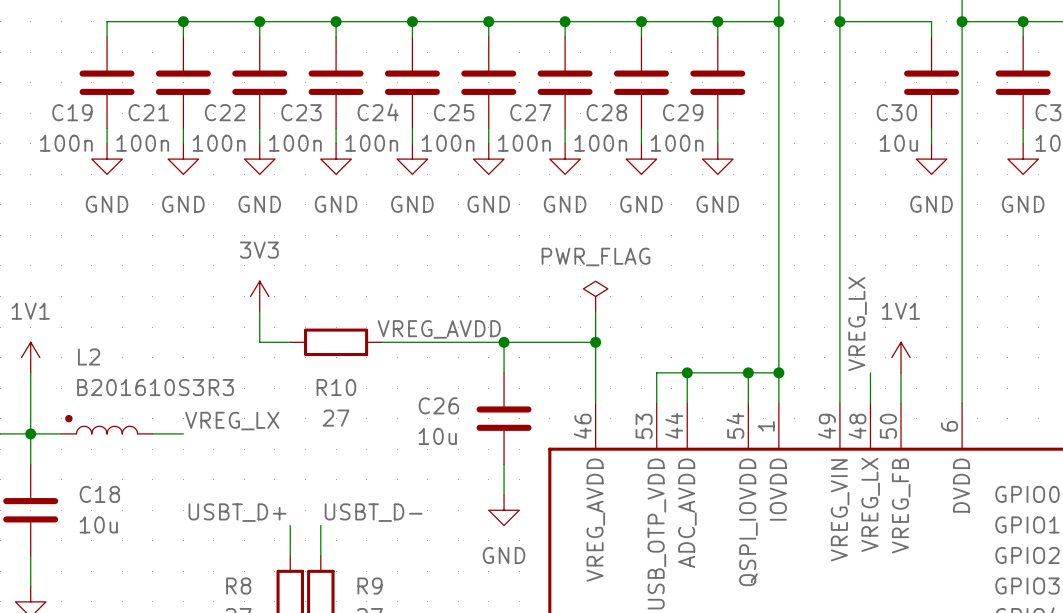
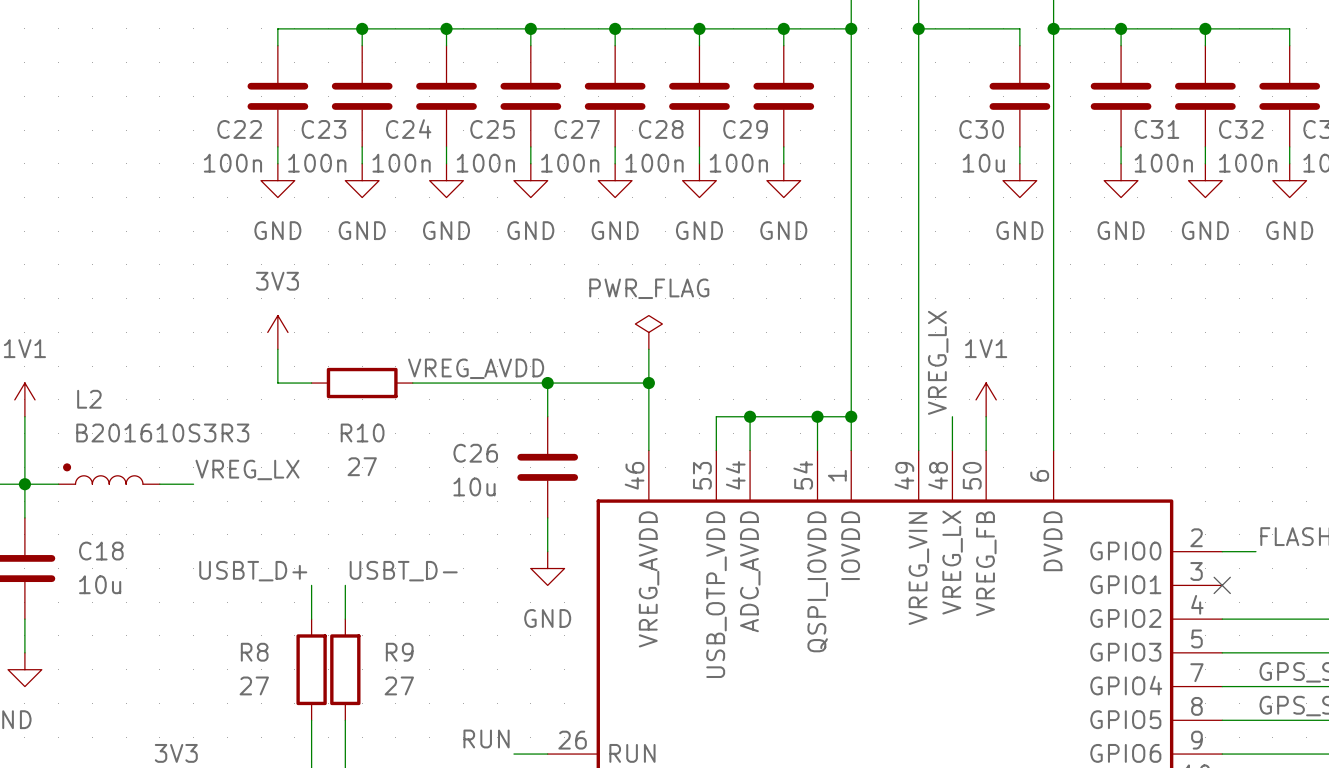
wire: (183, 21) (183, 36) -> none
junction: (183, 21) -> none
wire: (259, 21) (107, 21) (107, 36) -> none
junction: (259, 21) -> none
C19: 100n (107, 82) -> none
C21: 100n (183, 82) -> none
wire: (107, 128) (107, 143) -> none
wire: (183, 128) (183, 143) -> none
power symbol: GND (107, 159) -> none
power symbol: GND (183, 159) -> none

